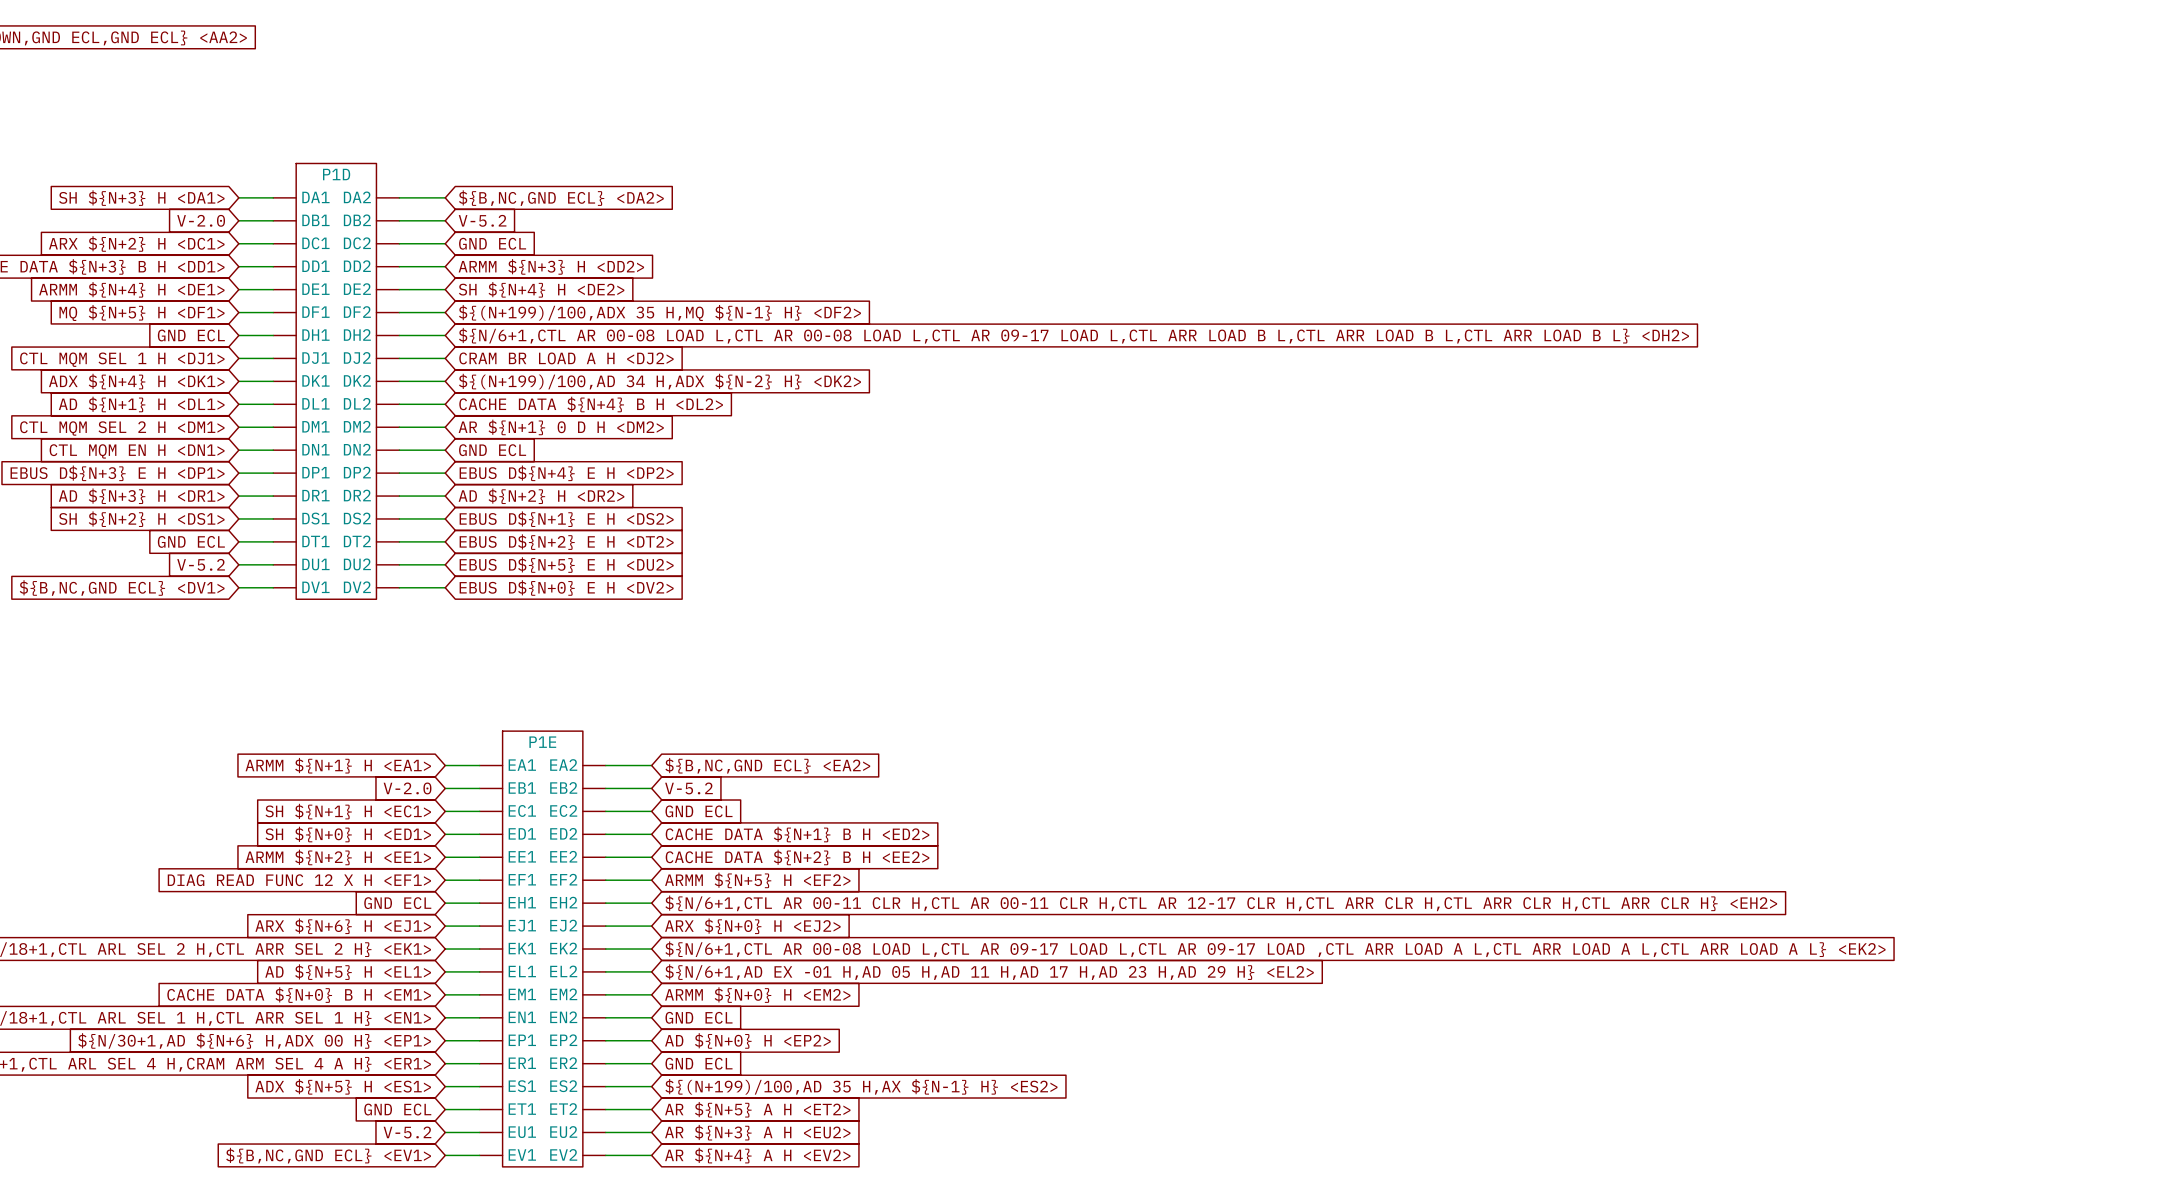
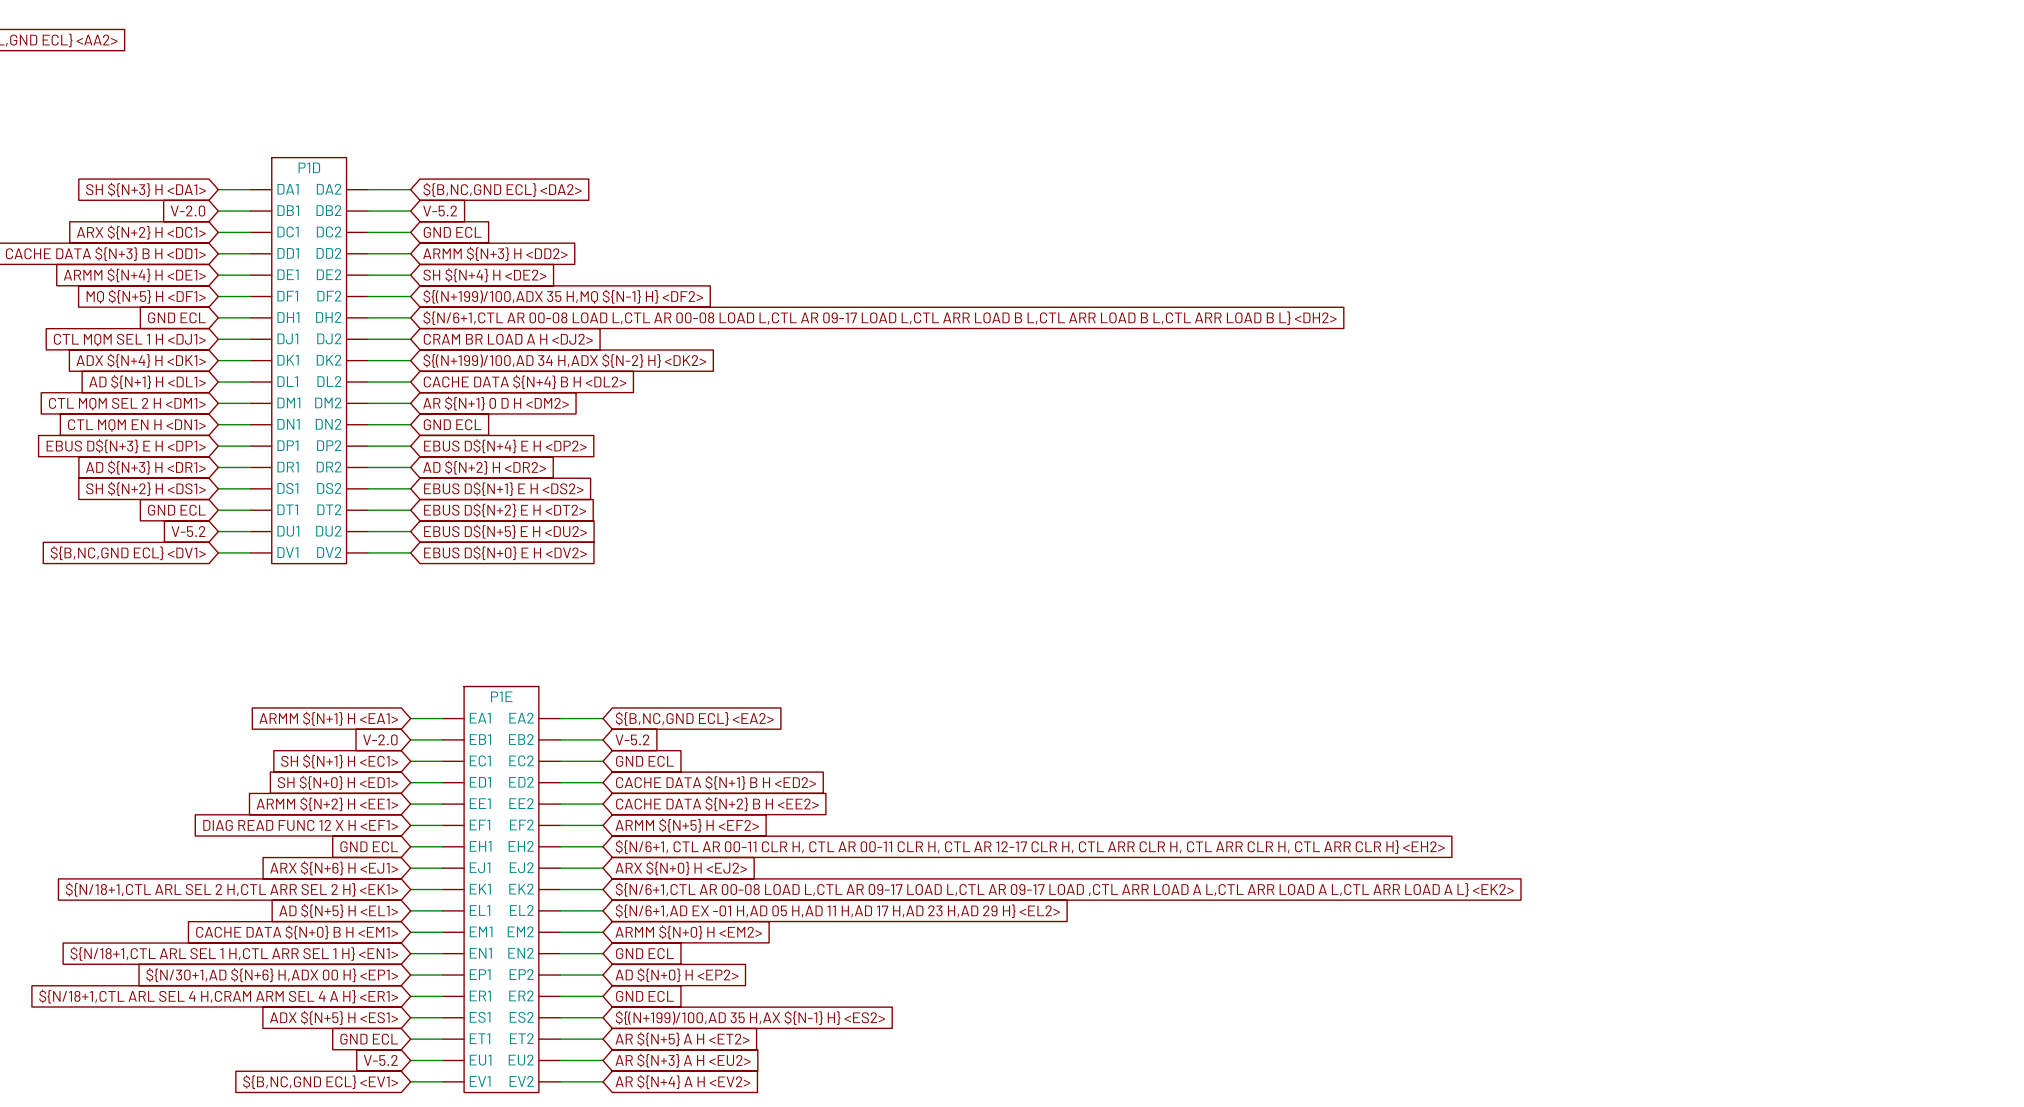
global label: ${N/6+1,CTL AR 00-11 CLR H,CTL AR 00-11 CLR H,CTL AR 12-17 CLR H,CTL ARR CLR H,CTL ARR CLR H,CTL ARR CLR H} <EH2> (1221, 903) -> ${N/6+1, CTL AR 00-11 CLR H, CTL AR 00-11 CLR H, CTL AR 12-17 CLR H, CTL ARR CLR H, CTL ARR CLR H, CTL ARR CLR H} <EH2> (1030, 846)

